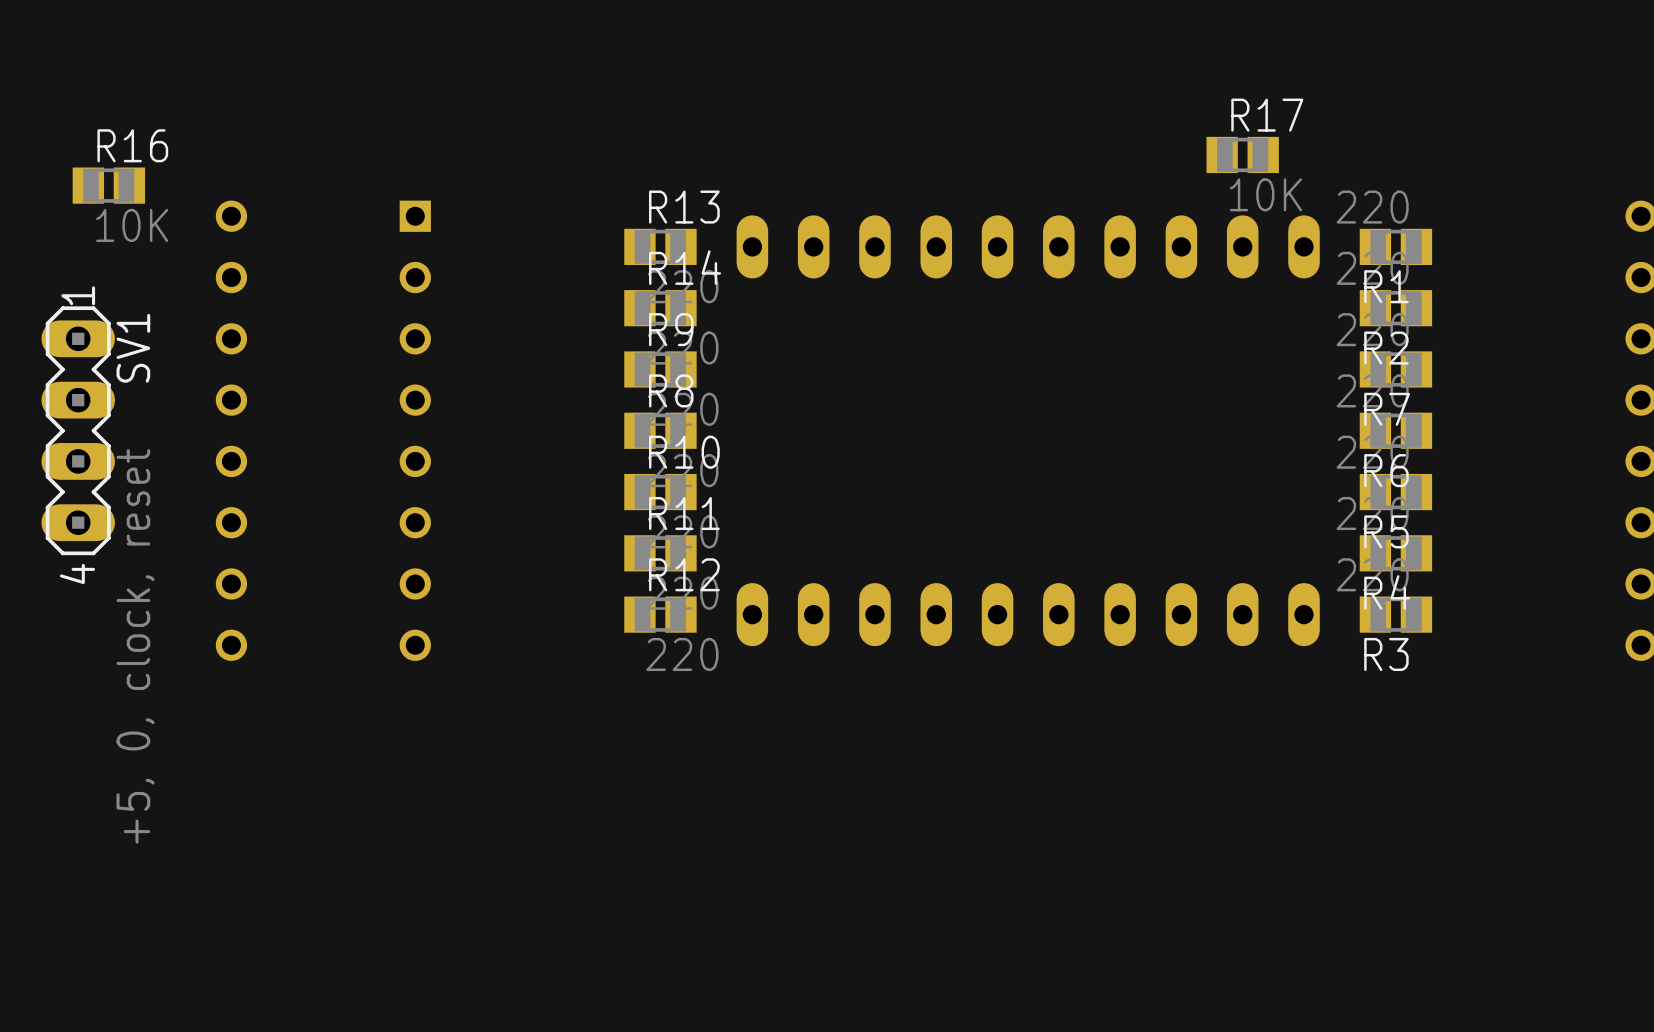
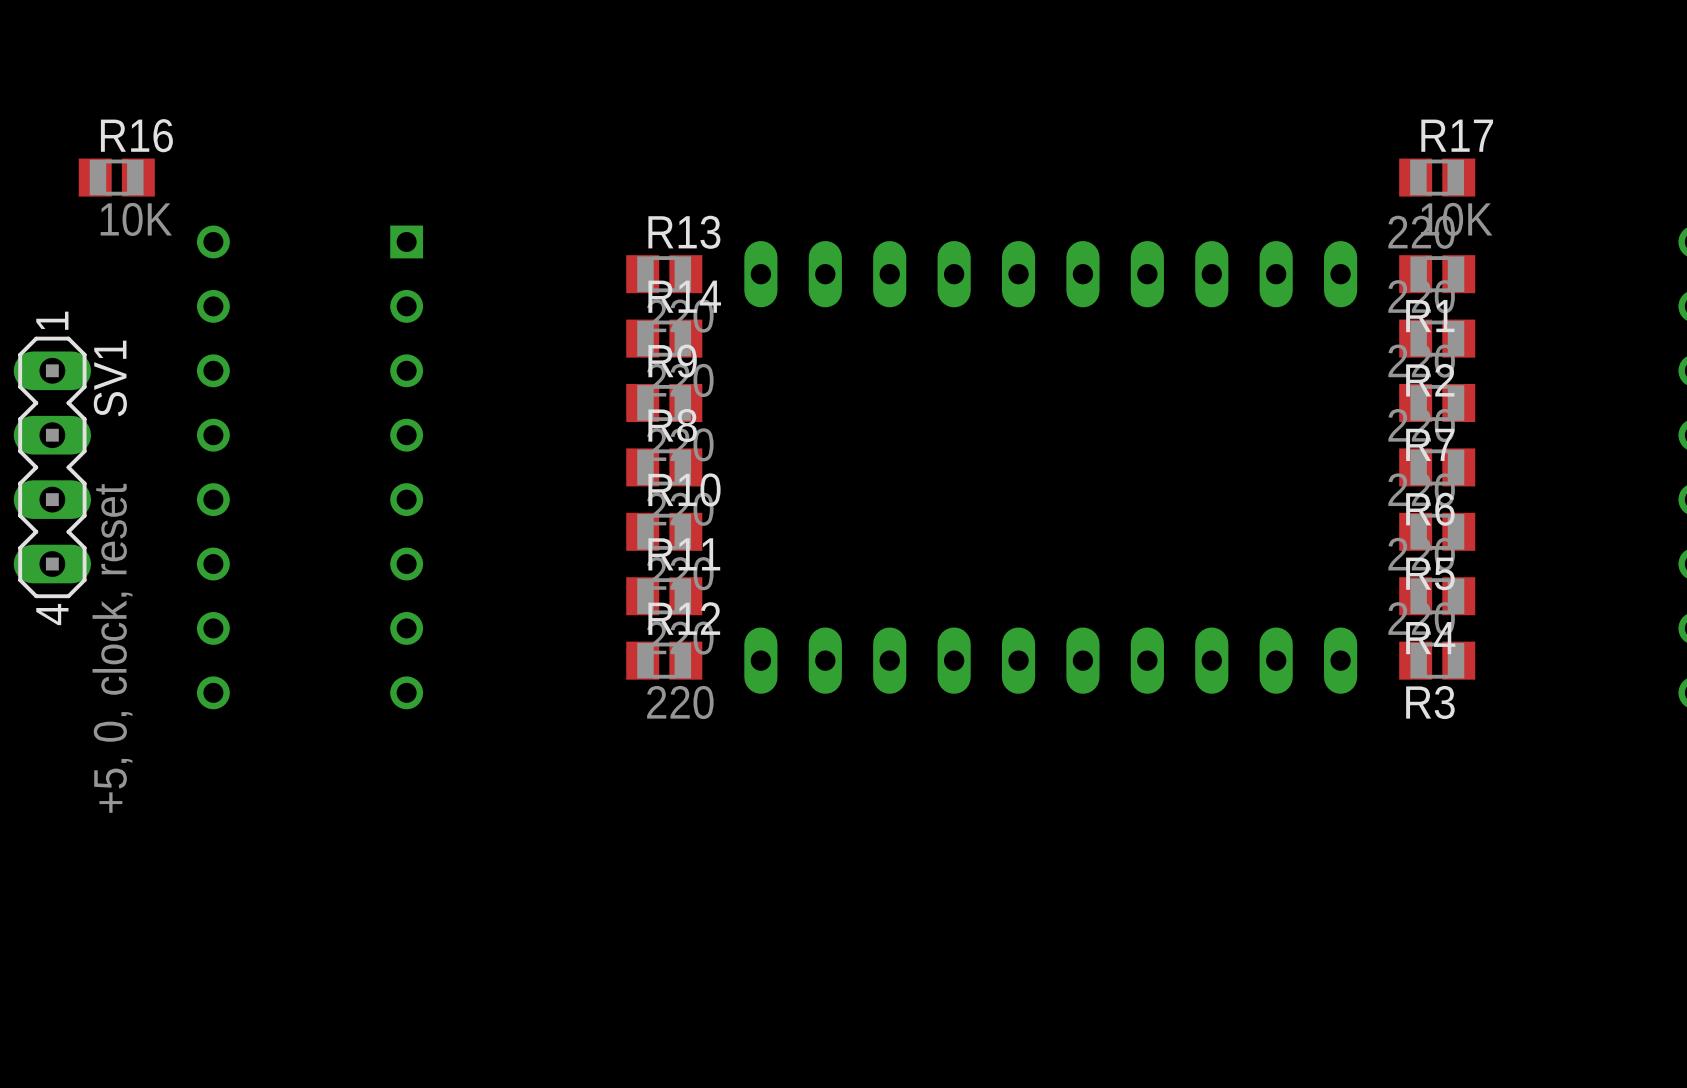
R17 position: (1242, 154) -> (1437, 177)
R16 position: (108, 185) -> (116, 177)

